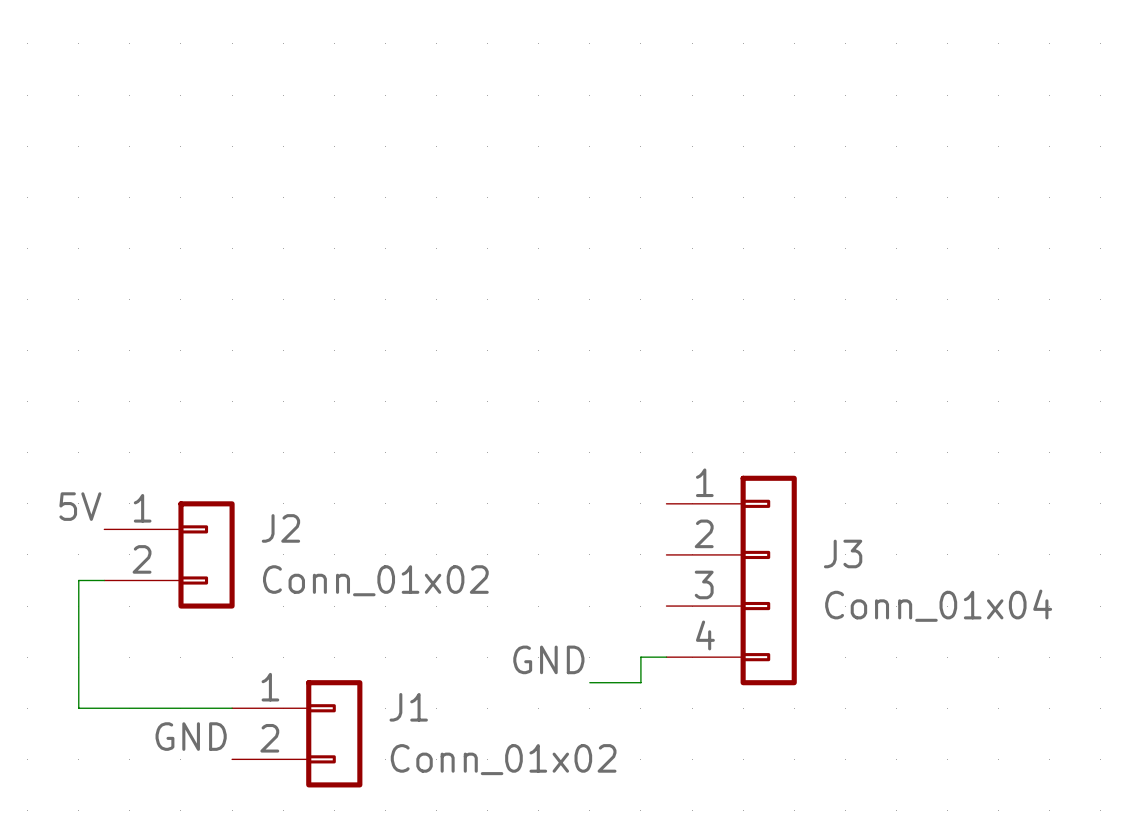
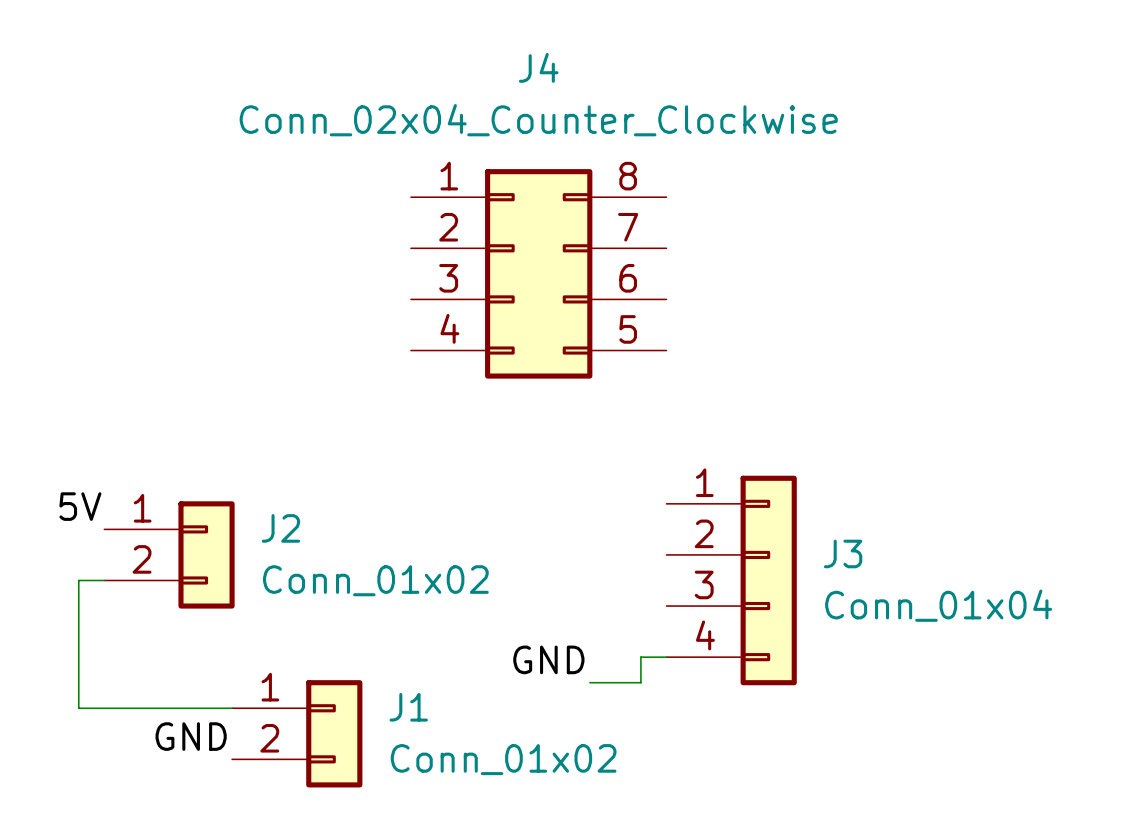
J4: none -> Conn_02x04_Counter_Clockwise (538, 273)

